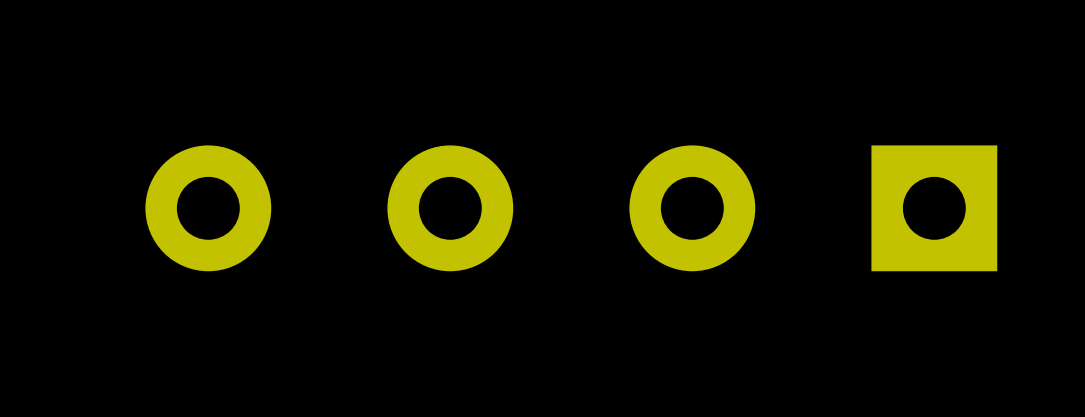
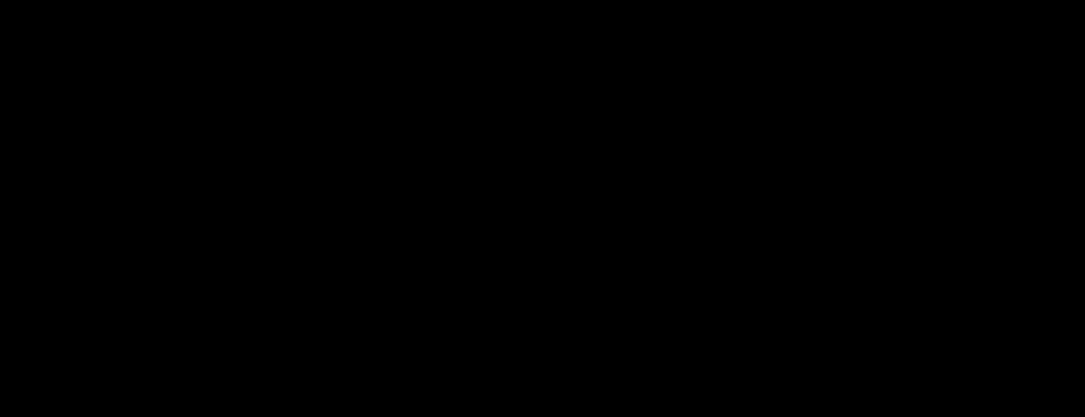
part: (571, 208) -> none

